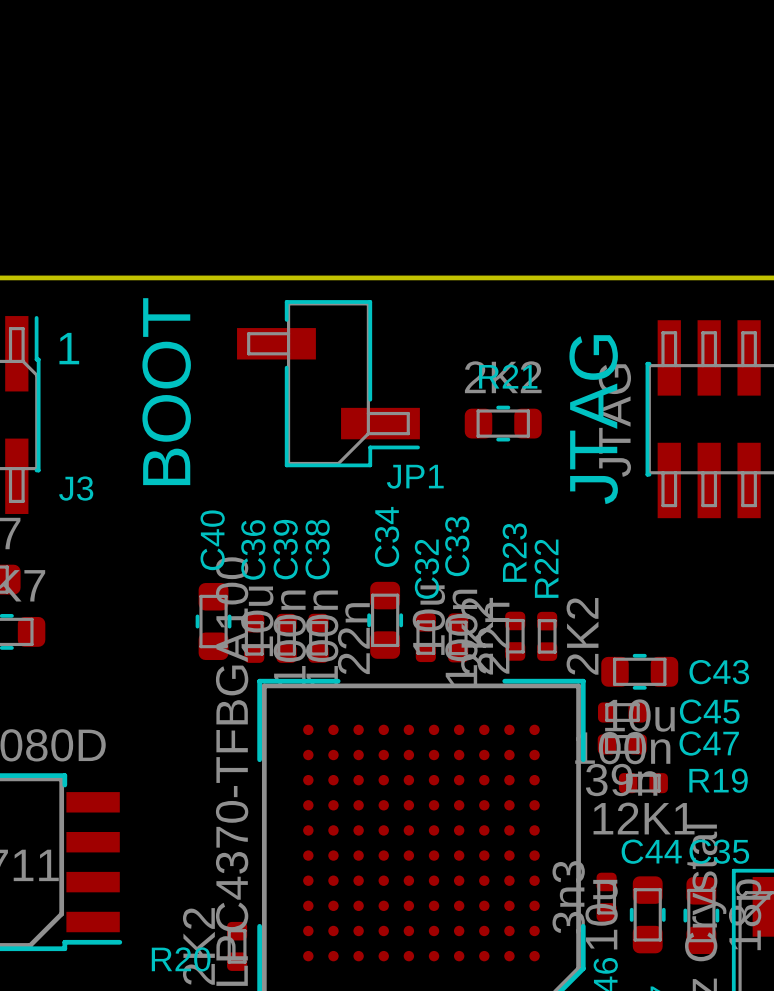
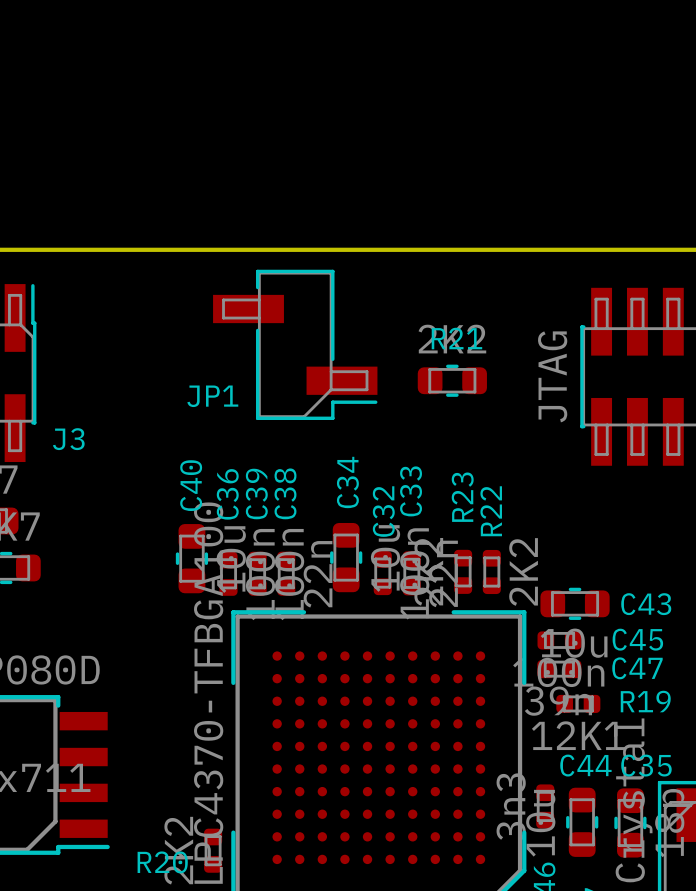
text: 1 (69, 348) -> none
text: BOOT (166, 391) -> none
text: JTAG (593, 419) -> none
JP1 name position: JP1 (415, 476) -> JP1 (212, 396)

